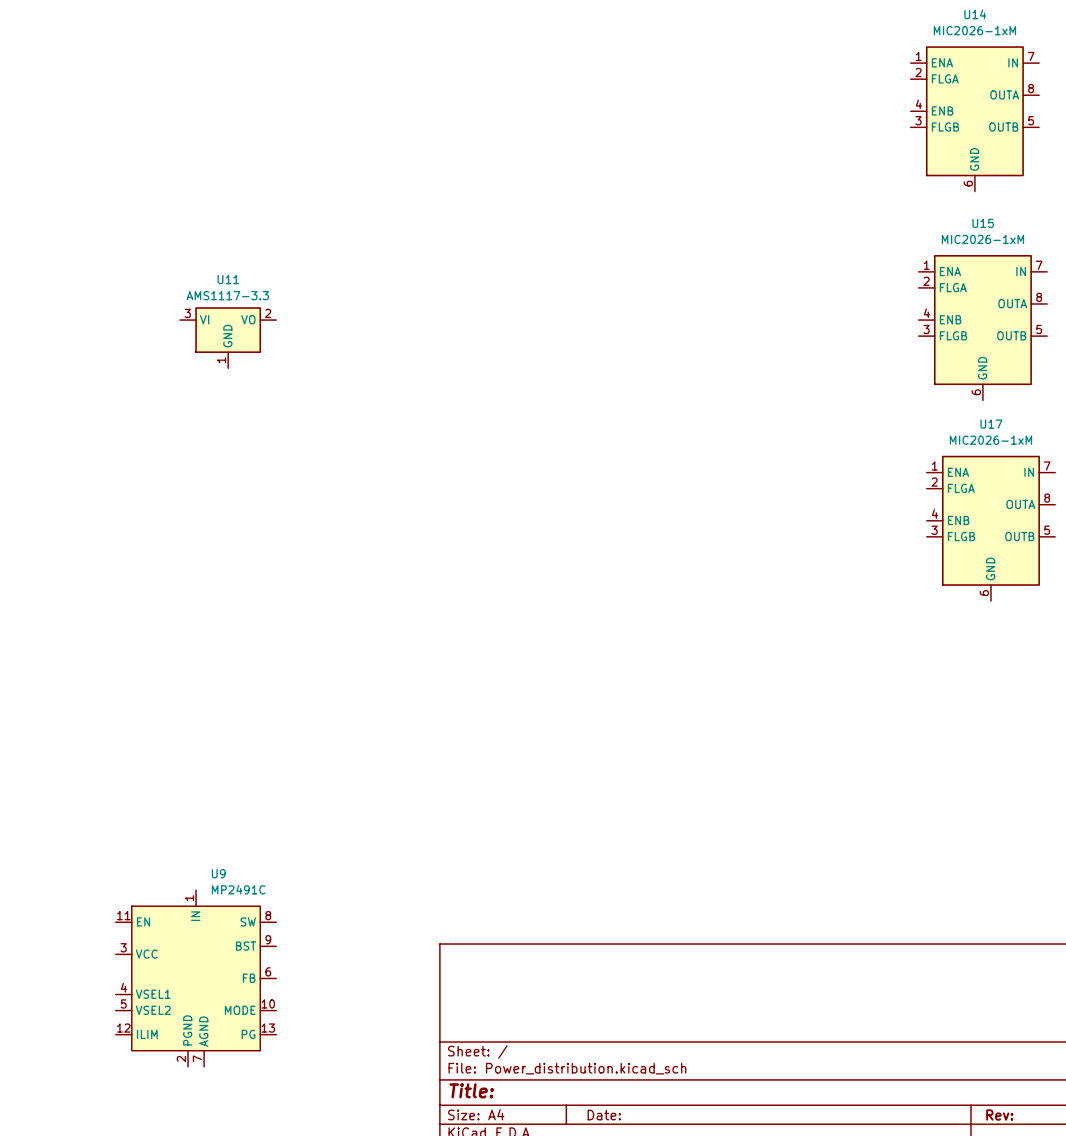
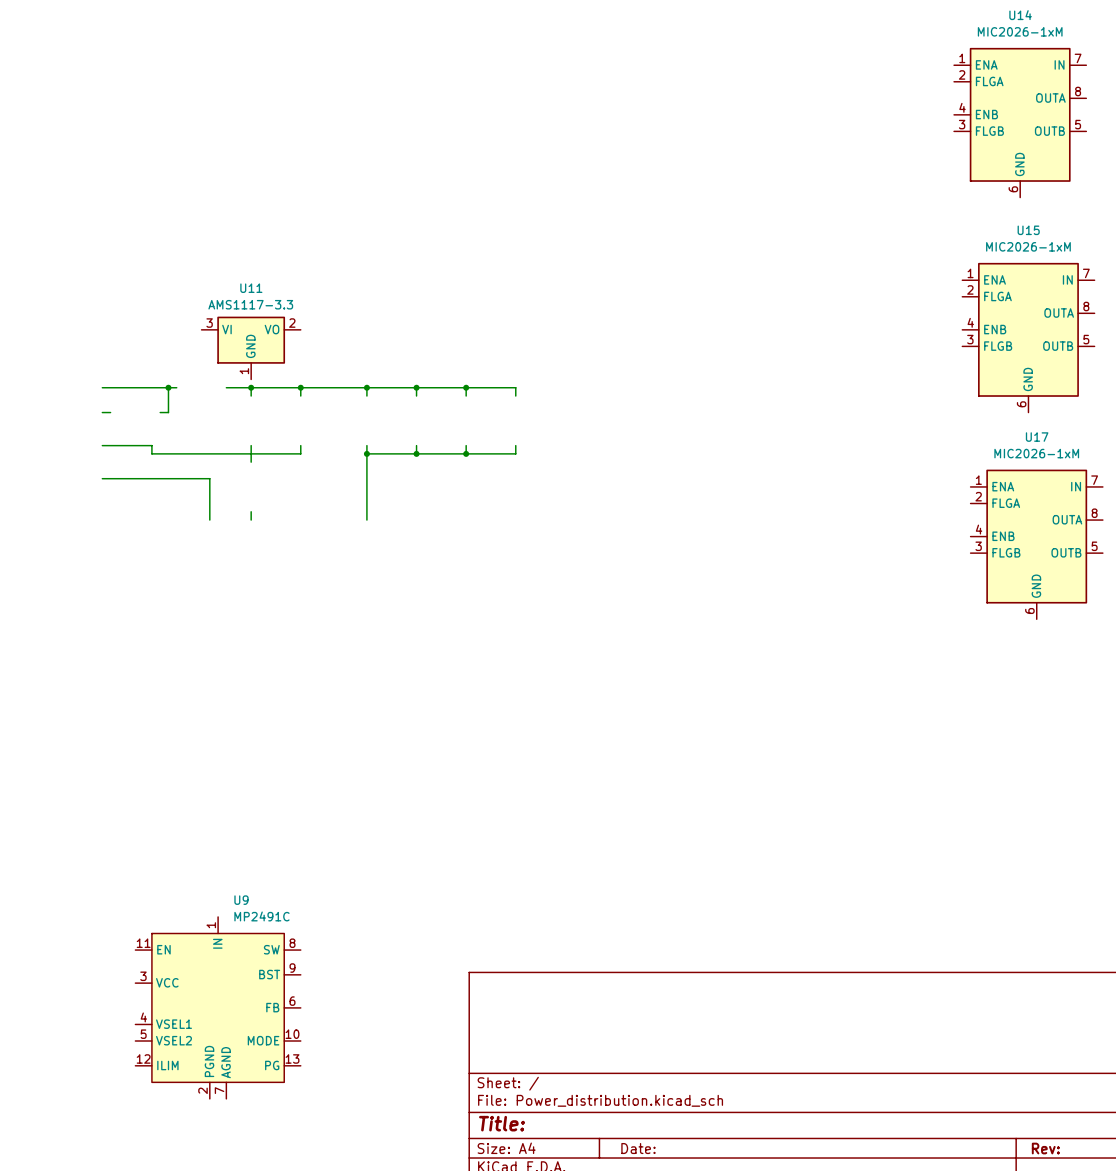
wire: none -> (102, 387) (176, 387)
wire: none -> (168, 387) (168, 412) (160, 412)
junction: none -> (168, 387)
wire: none -> (226, 387) (515, 387) (515, 396)
wire: none -> (251, 387) (251, 396)
junction: none -> (251, 387)
wire: none -> (300, 387) (300, 396)
junction: none -> (300, 387)
wire: none -> (366, 387) (366, 396)
junction: none -> (366, 387)
wire: none -> (416, 387) (416, 396)
junction: none -> (416, 387)
wire: none -> (466, 387) (466, 396)
junction: none -> (466, 387)
wire: none -> (102, 412) (110, 412)
wire: none -> (102, 445) (151, 445) (151, 453) (300, 453) (300, 445)
wire: none -> (251, 445) (251, 462)
wire: none -> (366, 445) (366, 520)
wire: none -> (416, 445) (416, 453)
wire: none -> (466, 445) (466, 453)
wire: none -> (515, 445) (515, 453) (366, 453)
junction: none -> (366, 453)
junction: none -> (416, 453)
junction: none -> (466, 453)
wire: none -> (102, 478) (209, 478) (209, 520)
wire: none -> (251, 511) (251, 520)

